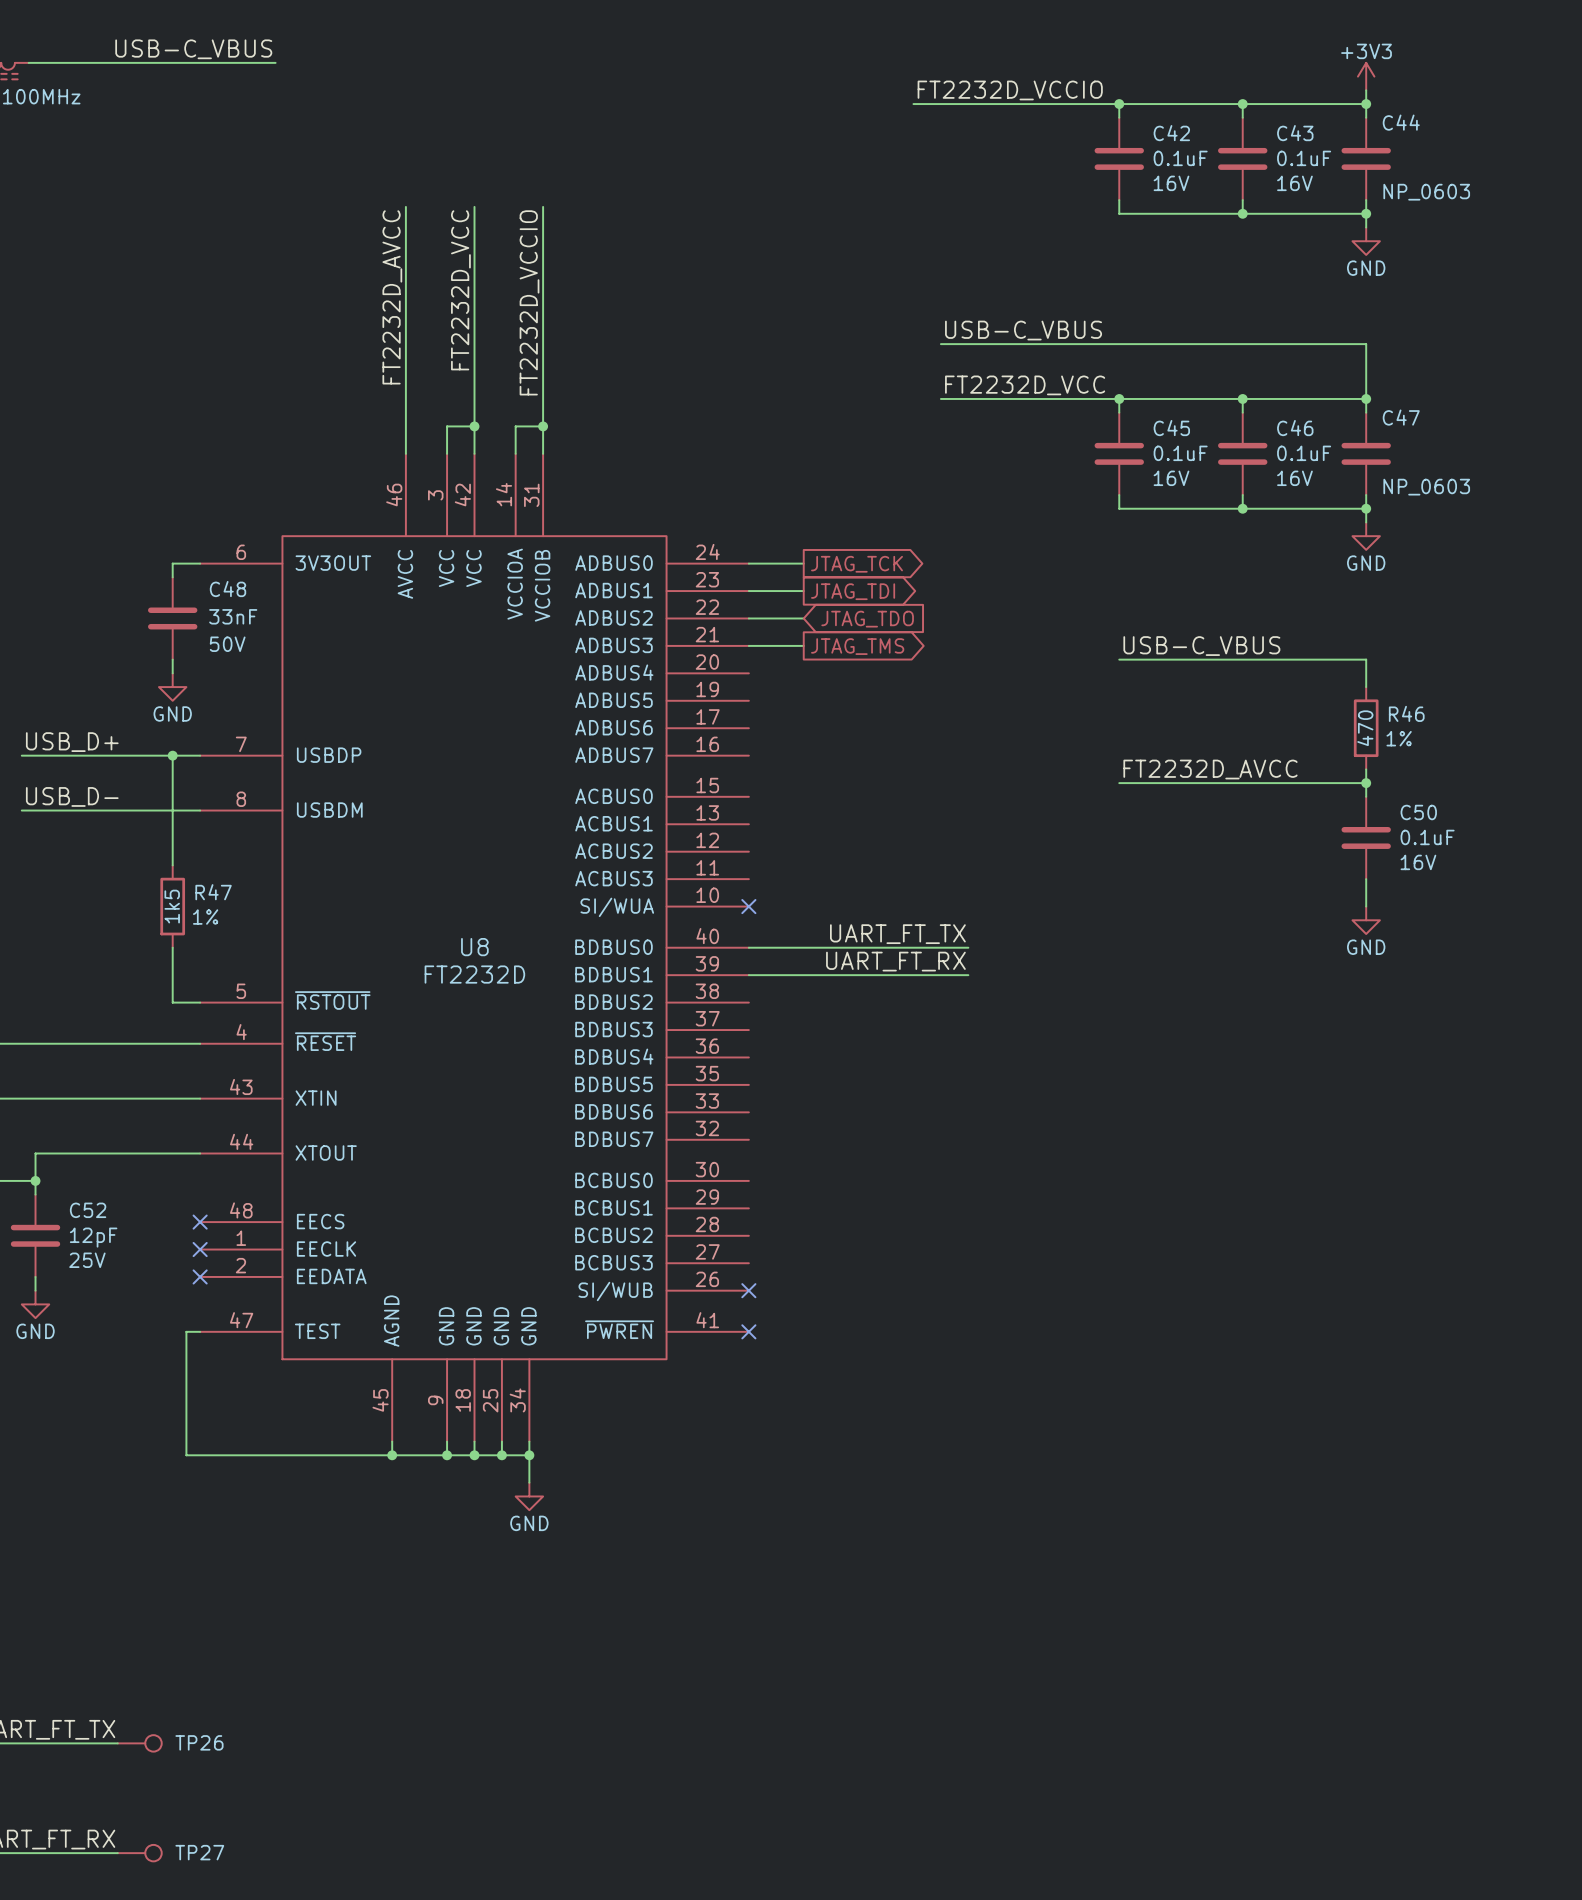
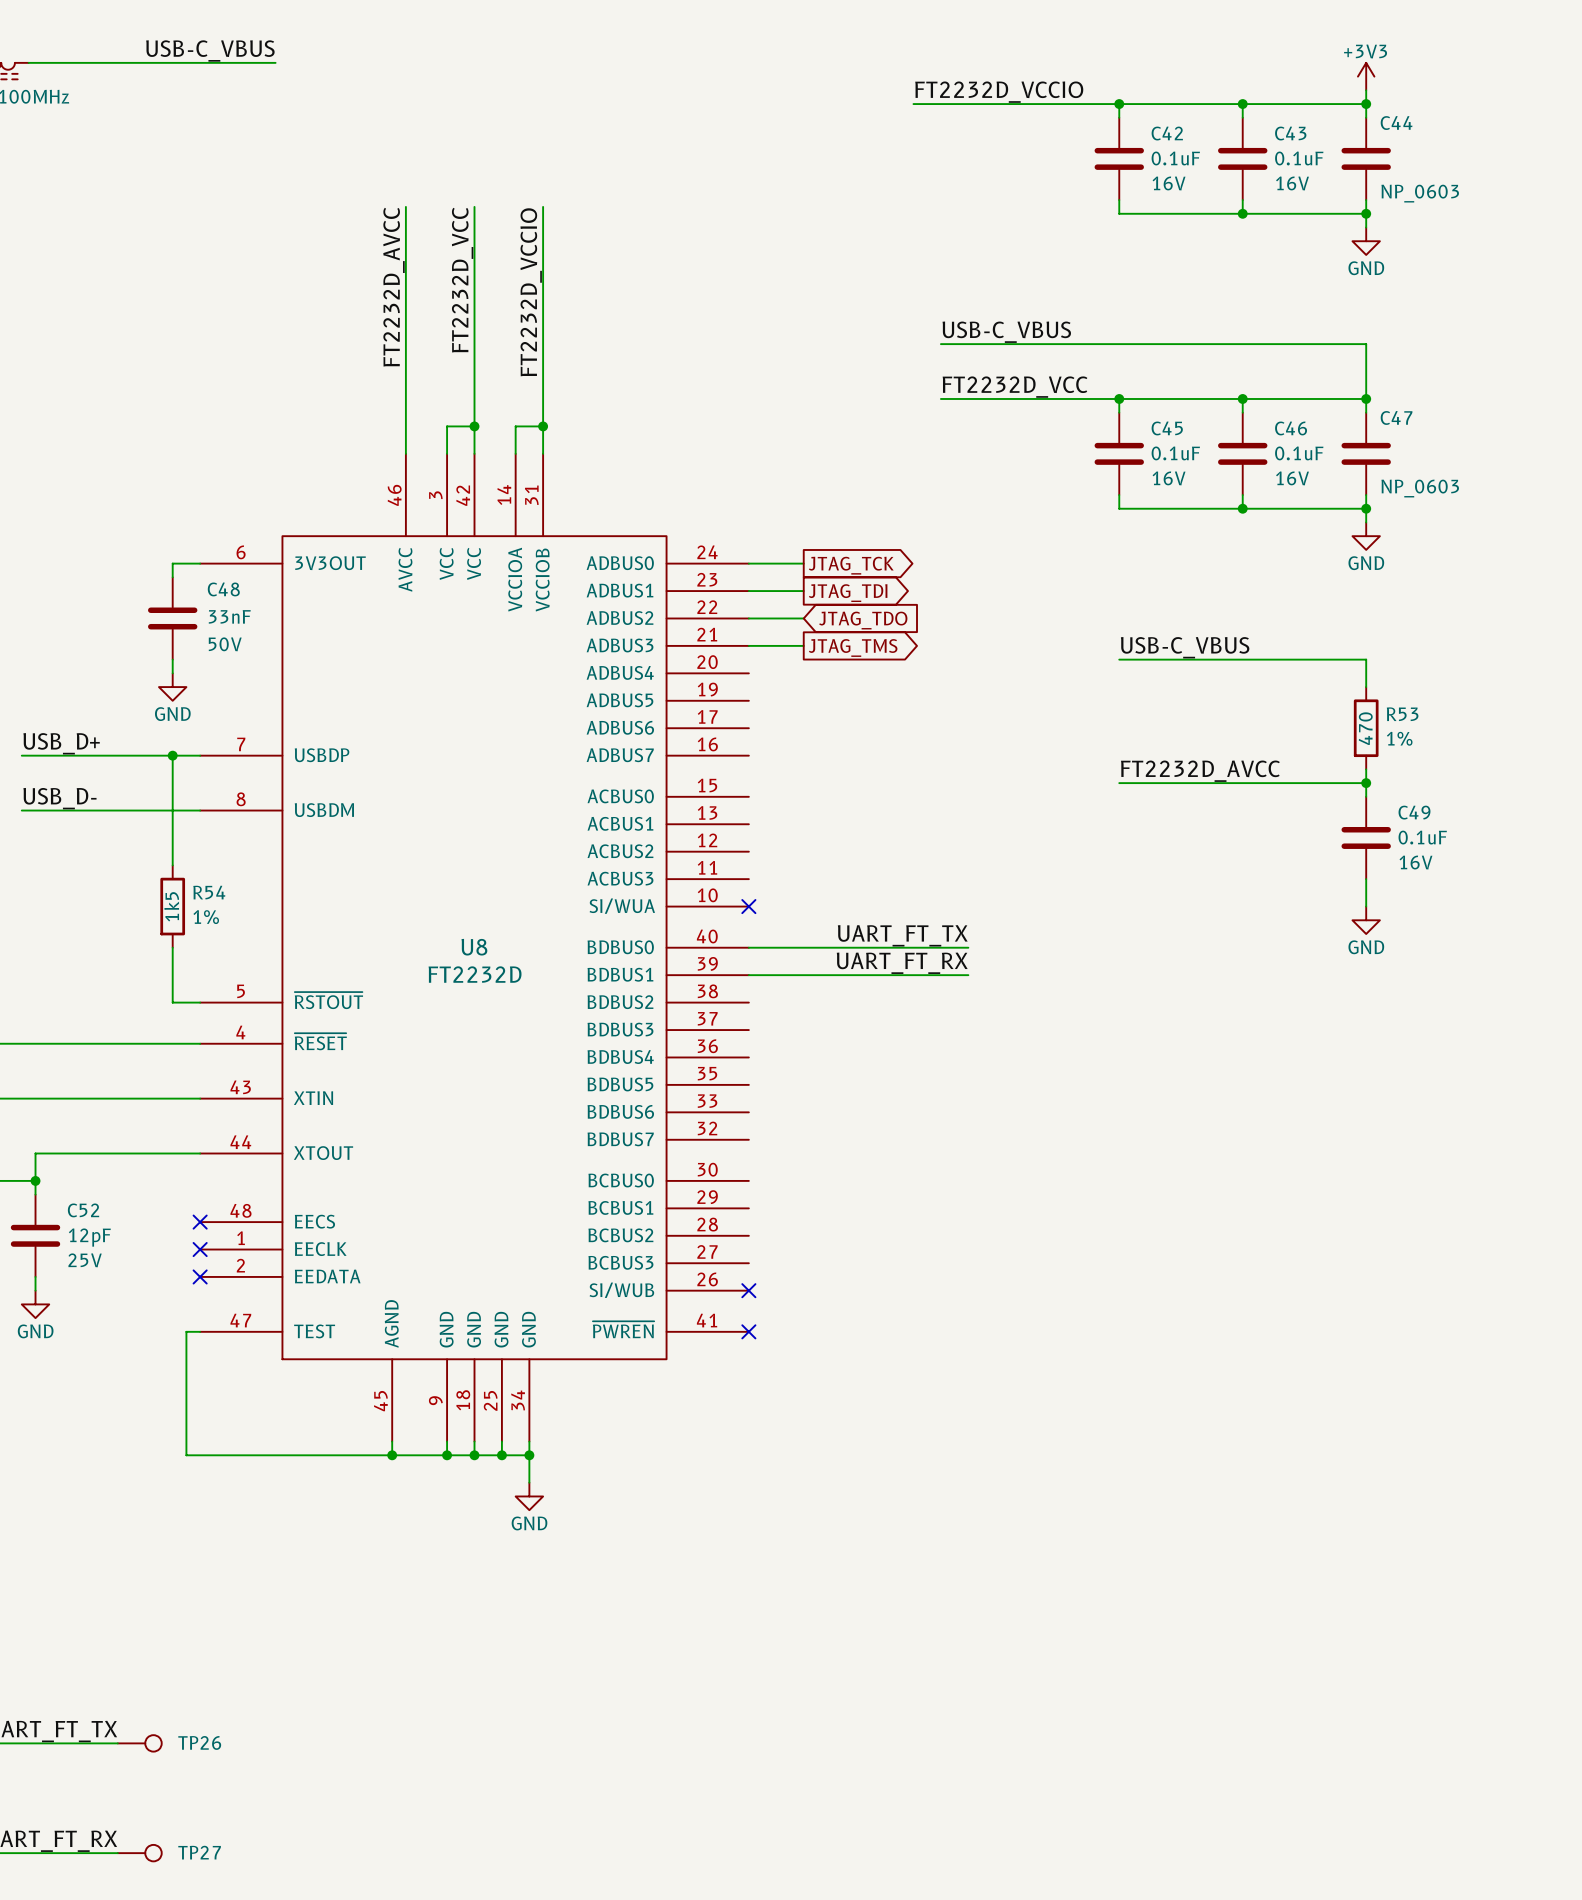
R46 name: R46 (1406, 713) -> R53 (1402, 714)
C50 name: C50 (1418, 812) -> C49 (1414, 812)
R47 name: R47 (213, 892) -> R54 (209, 892)

